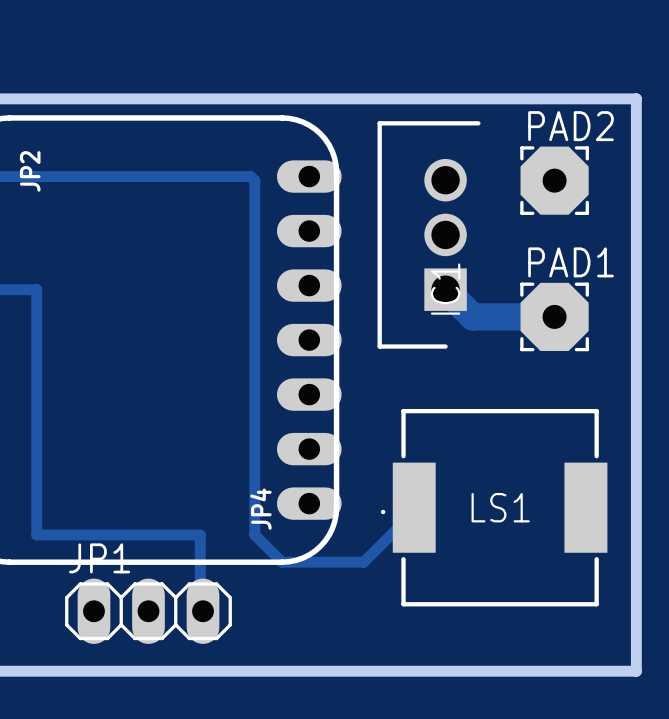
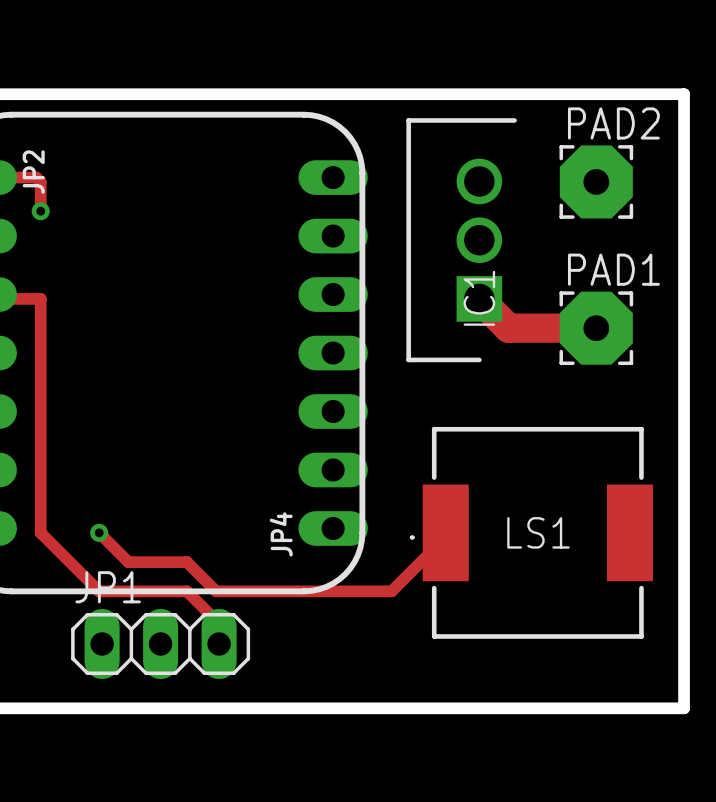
track: (32, 176) (250, 176) (254, 180) (254, 534) (282, 562) -> (36, 177) (40, 181) (40, 211)
via: none -> (40, 211)
track: (36, 507) (36, 534) (118, 534) -> (99, 532) (128, 562)
track: none -> (40, 532) (99, 591) (186, 591) (216, 620)
via: none -> (99, 532)
track: (173, 534) (200, 534) (200, 589) -> (186, 562) (216, 591) (303, 591)

